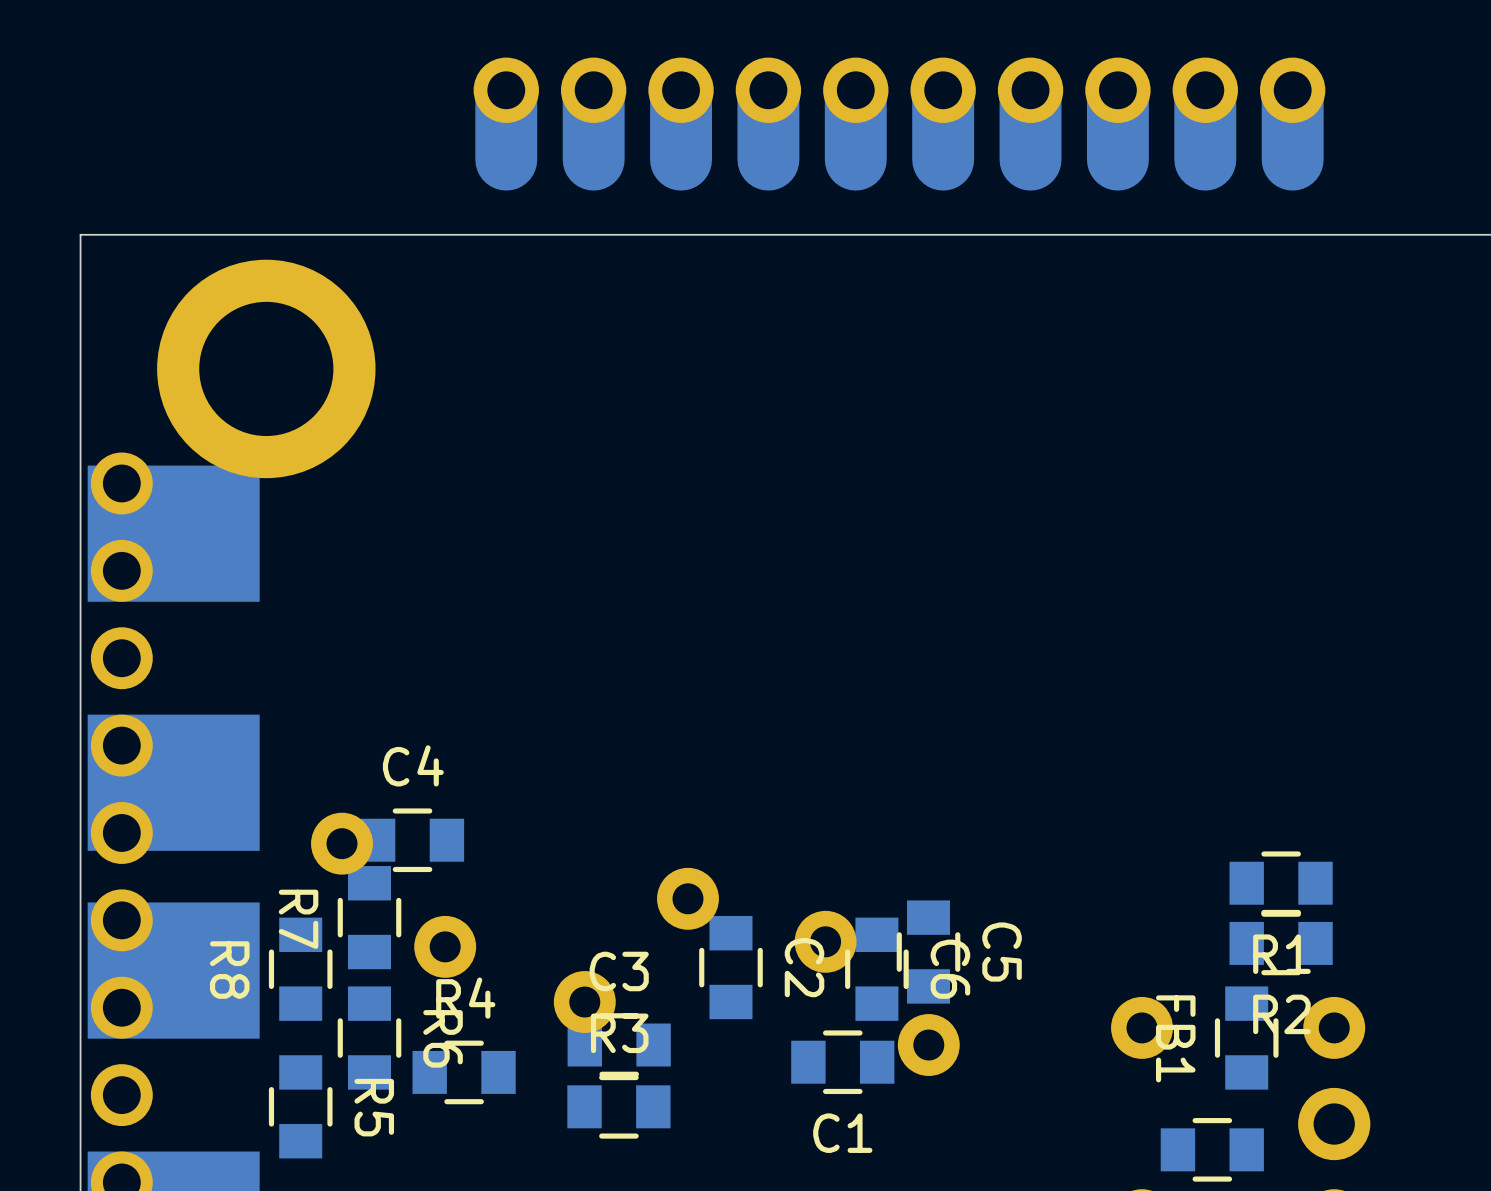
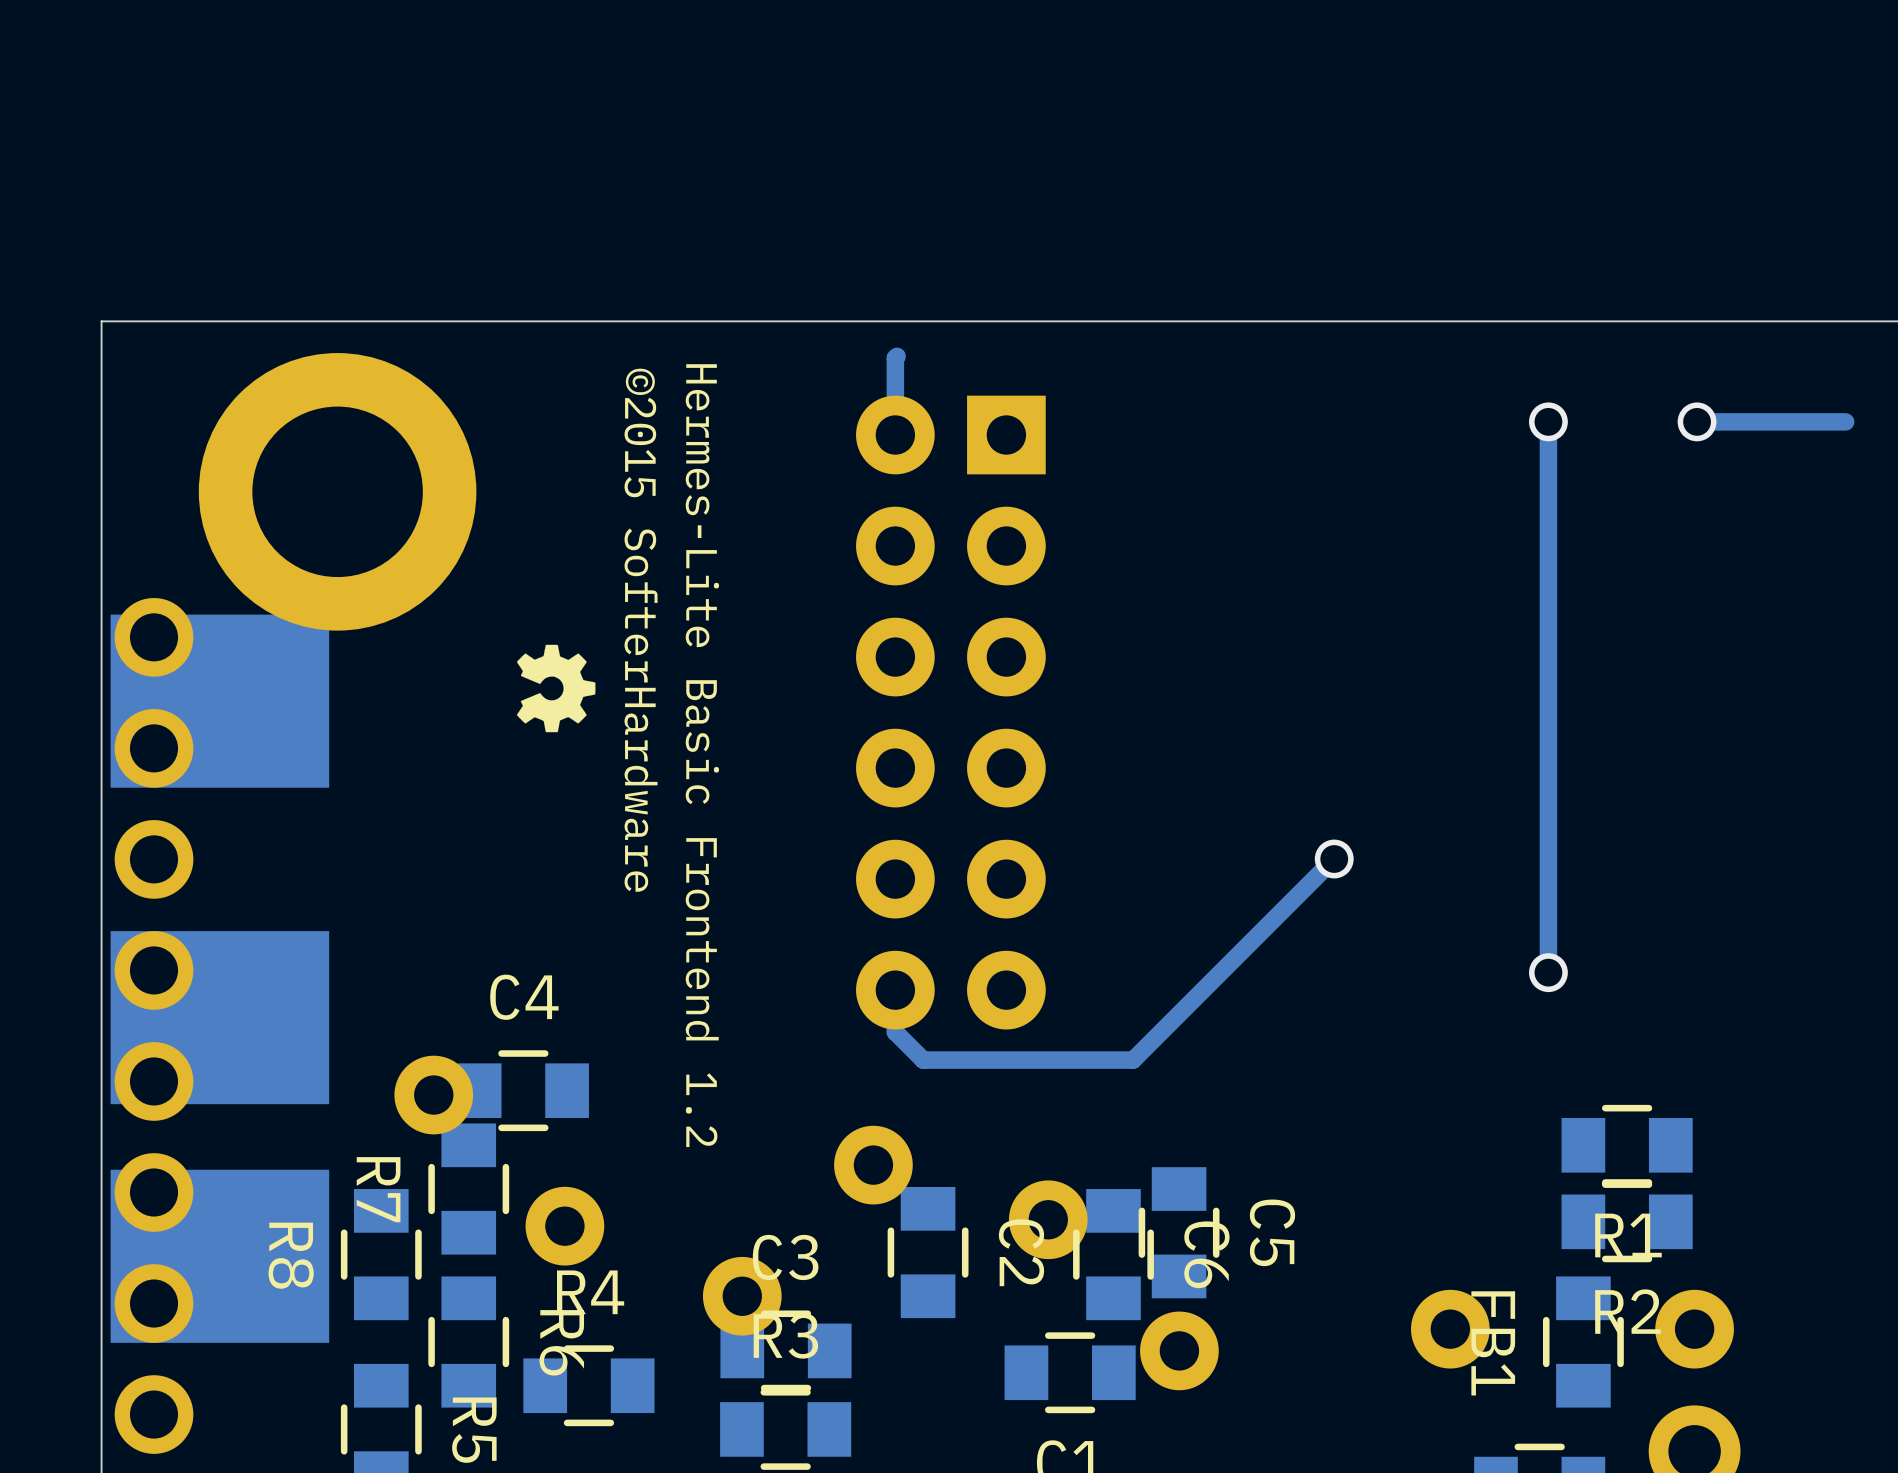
part: (899, 124) -> none
track: none -> (897, 356) (895, 358) (895, 435)
track: none -> (1548, 421) (1548, 972)
via: none -> (1548, 421)
via: none -> (1697, 421)
track: none -> (1845, 421) (1697, 421)
text: none -> ©2015 SofterHardware (641, 630)
drawing: none -> [516, 644, 596, 733]
part: none -> (950, 712)
text: none -> Hermes-Lite Basic Frontend 1.2 (702, 755)
track: none -> (1334, 859) (1133, 1060) (923, 1060) (895, 1032) (895, 990)
via: none -> (1334, 859)
via: none -> (1548, 972)

